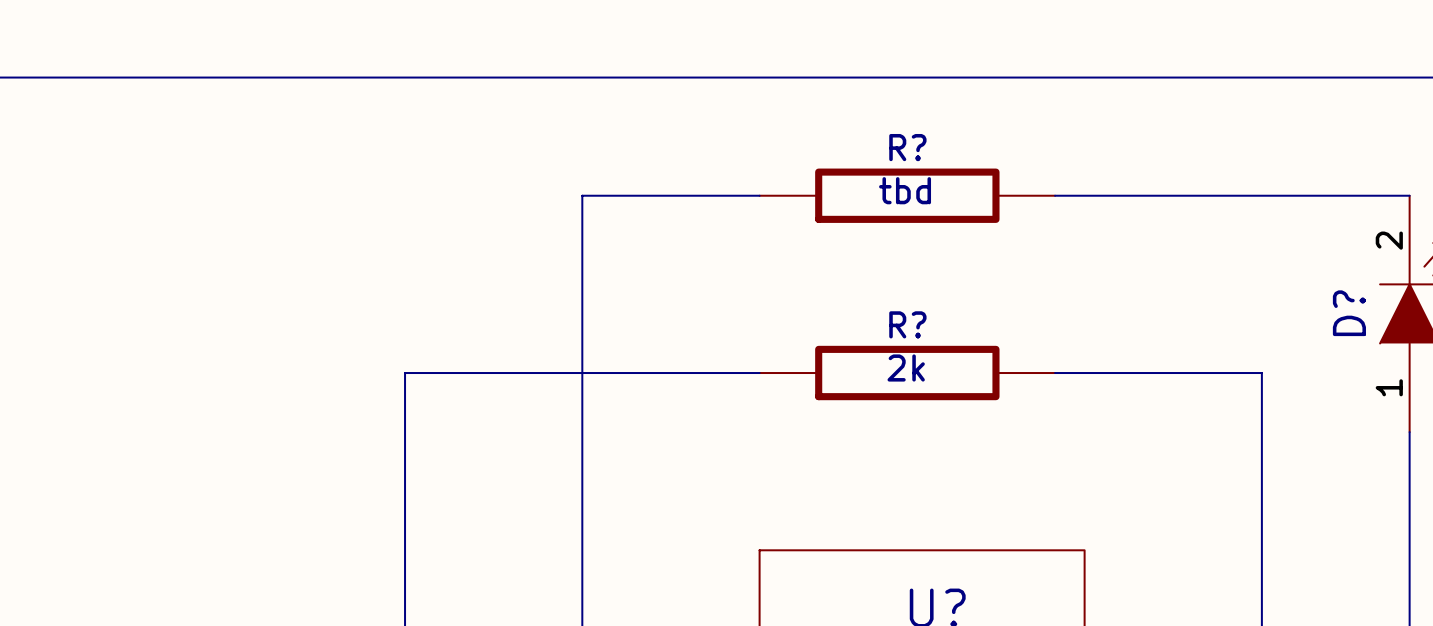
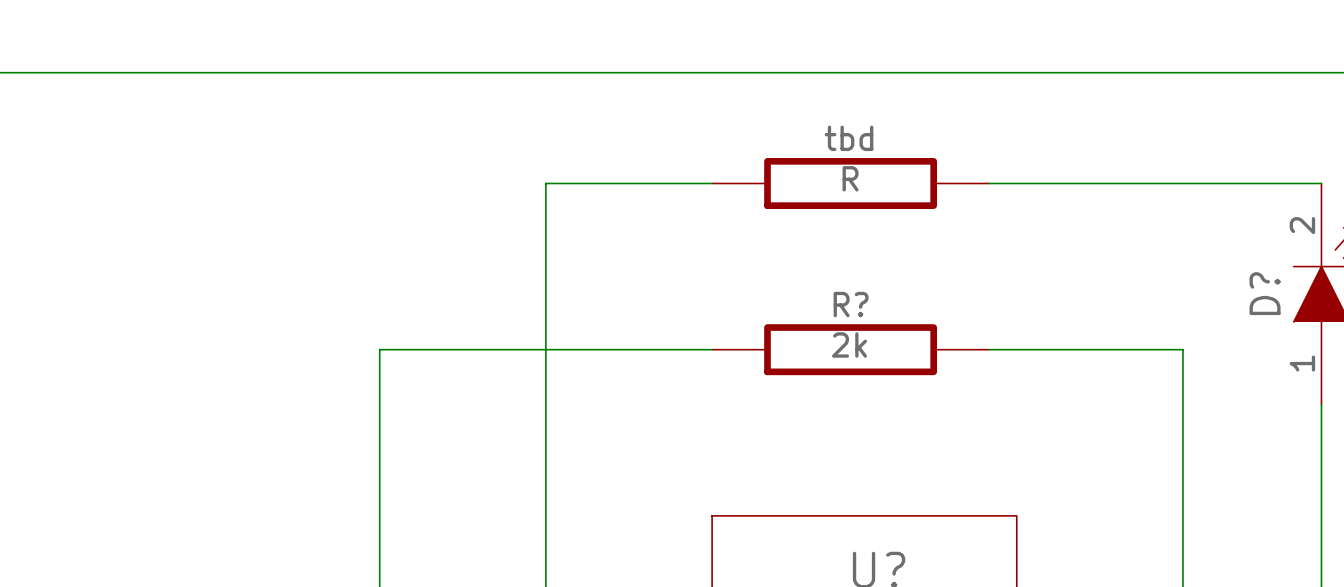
R? name: R? (907, 147) -> tbd (849, 138)
R? value: tbd (905, 190) -> R (850, 178)

